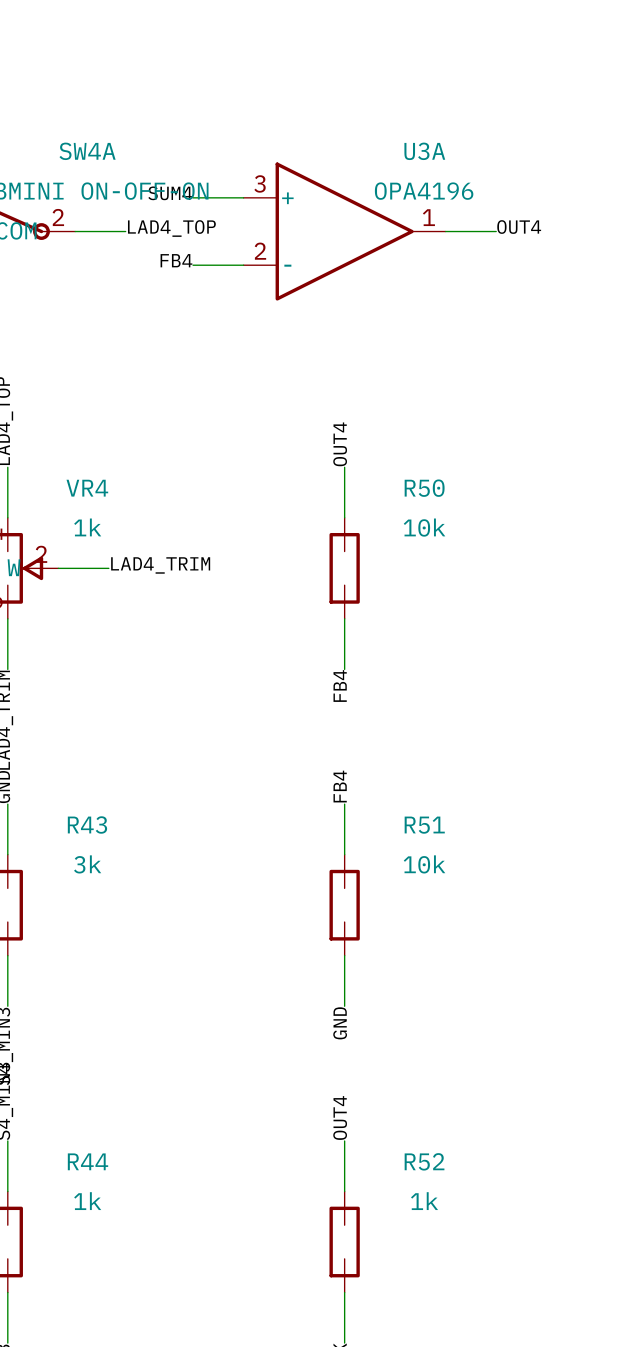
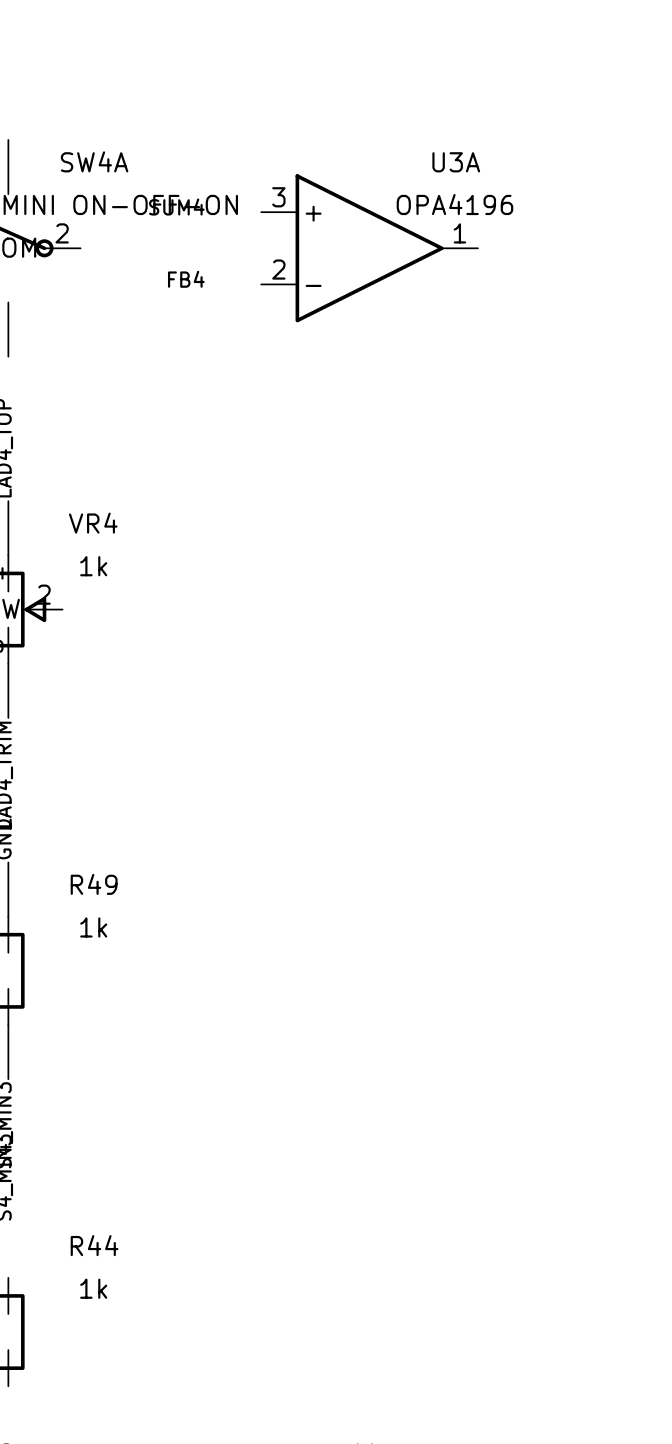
wire: none -> (8, 139) (8, 194)
wire: (193, 197) (243, 197) -> none
label: OUT4 (519, 227) -> none
label: LAD4_TOP (171, 228) -> none
wire: (75, 231) (125, 231) -> none
wire: (445, 231) (496, 231) -> none
wire: (193, 265) (243, 265) -> none
wire: none -> (8, 302) (8, 356)
label: OUT4 (340, 444) -> none
wire: (344, 467) (344, 517) -> none
label: LAD4_TRIM (160, 565) -> none
wire: (58, 568) (108, 568) -> none
R50: 10k (344, 568) -> none
wire: (344, 618) (344, 669) -> none
label: FB4 (340, 686) -> none
label: FB4 (340, 786) -> none
wire: (344, 804) (344, 854) -> none
R43 name: R43 (87, 825) -> R49 (94, 884)
R43 value: 3k (87, 864) -> 1k (93, 927)
R51: 10k (344, 905) -> none
wire: (344, 955) (344, 1006) -> none
label: GND (340, 1023) -> none
label: OUT4 (340, 1118) -> none
wire: (7, 1140) (7, 1191) -> none
wire: (344, 1140) (344, 1191) -> none
R52: 1k (344, 1242) -> none
wire: (7, 1292) (7, 1343) -> none
wire: (344, 1292) (344, 1343) -> none

